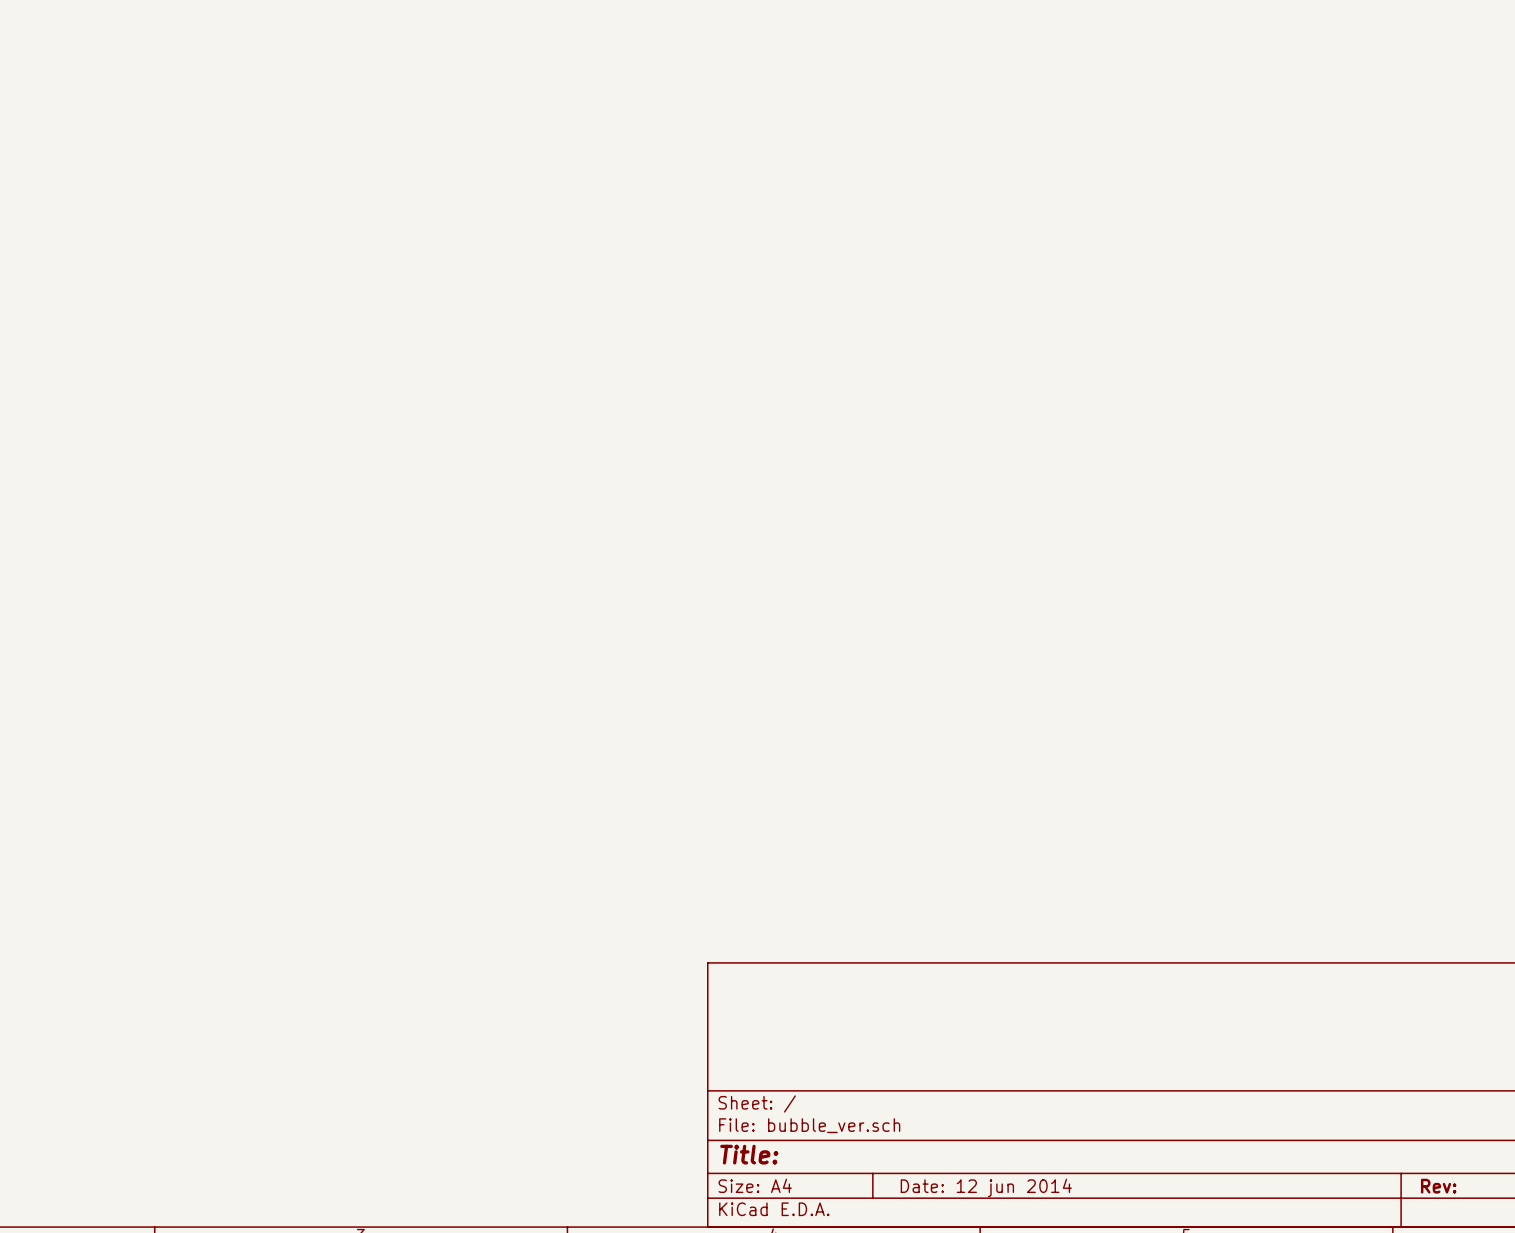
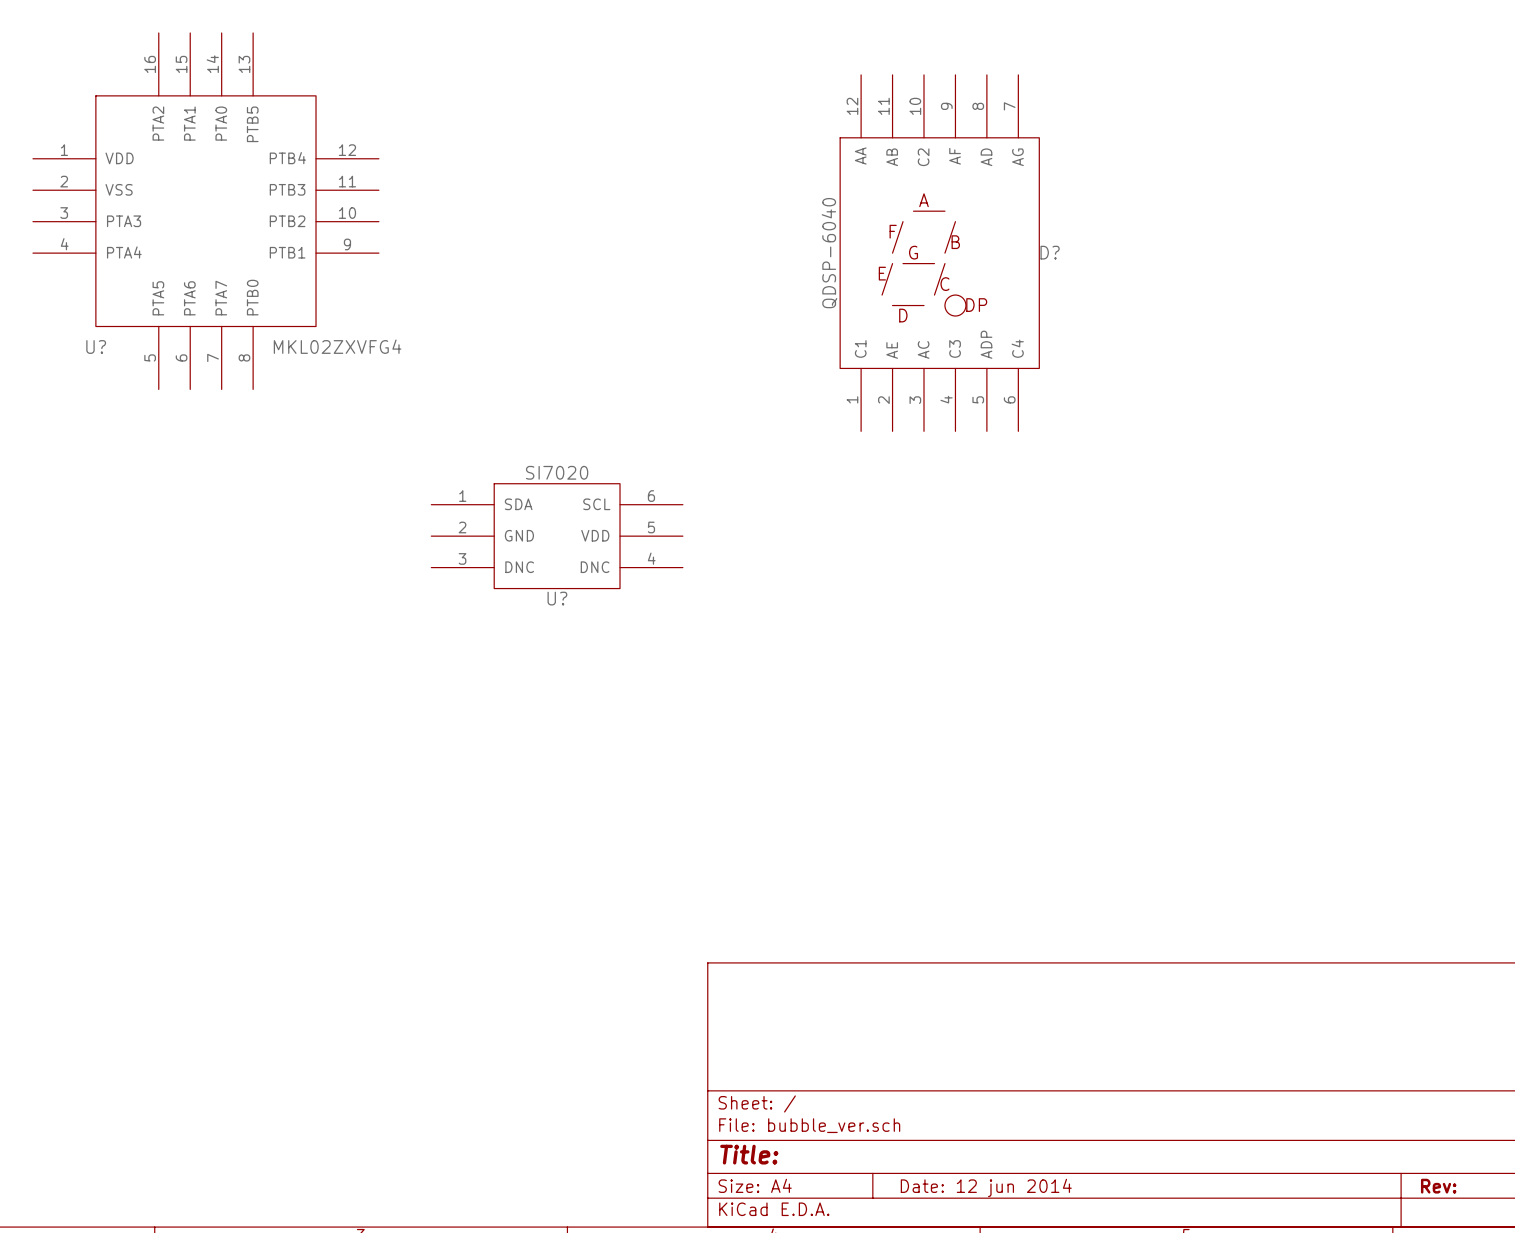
U?: none -> MKL02ZXVFG4 (205, 211)
D?: none -> QDSP-6040 (939, 253)
U?: none -> SI7020 (557, 536)

